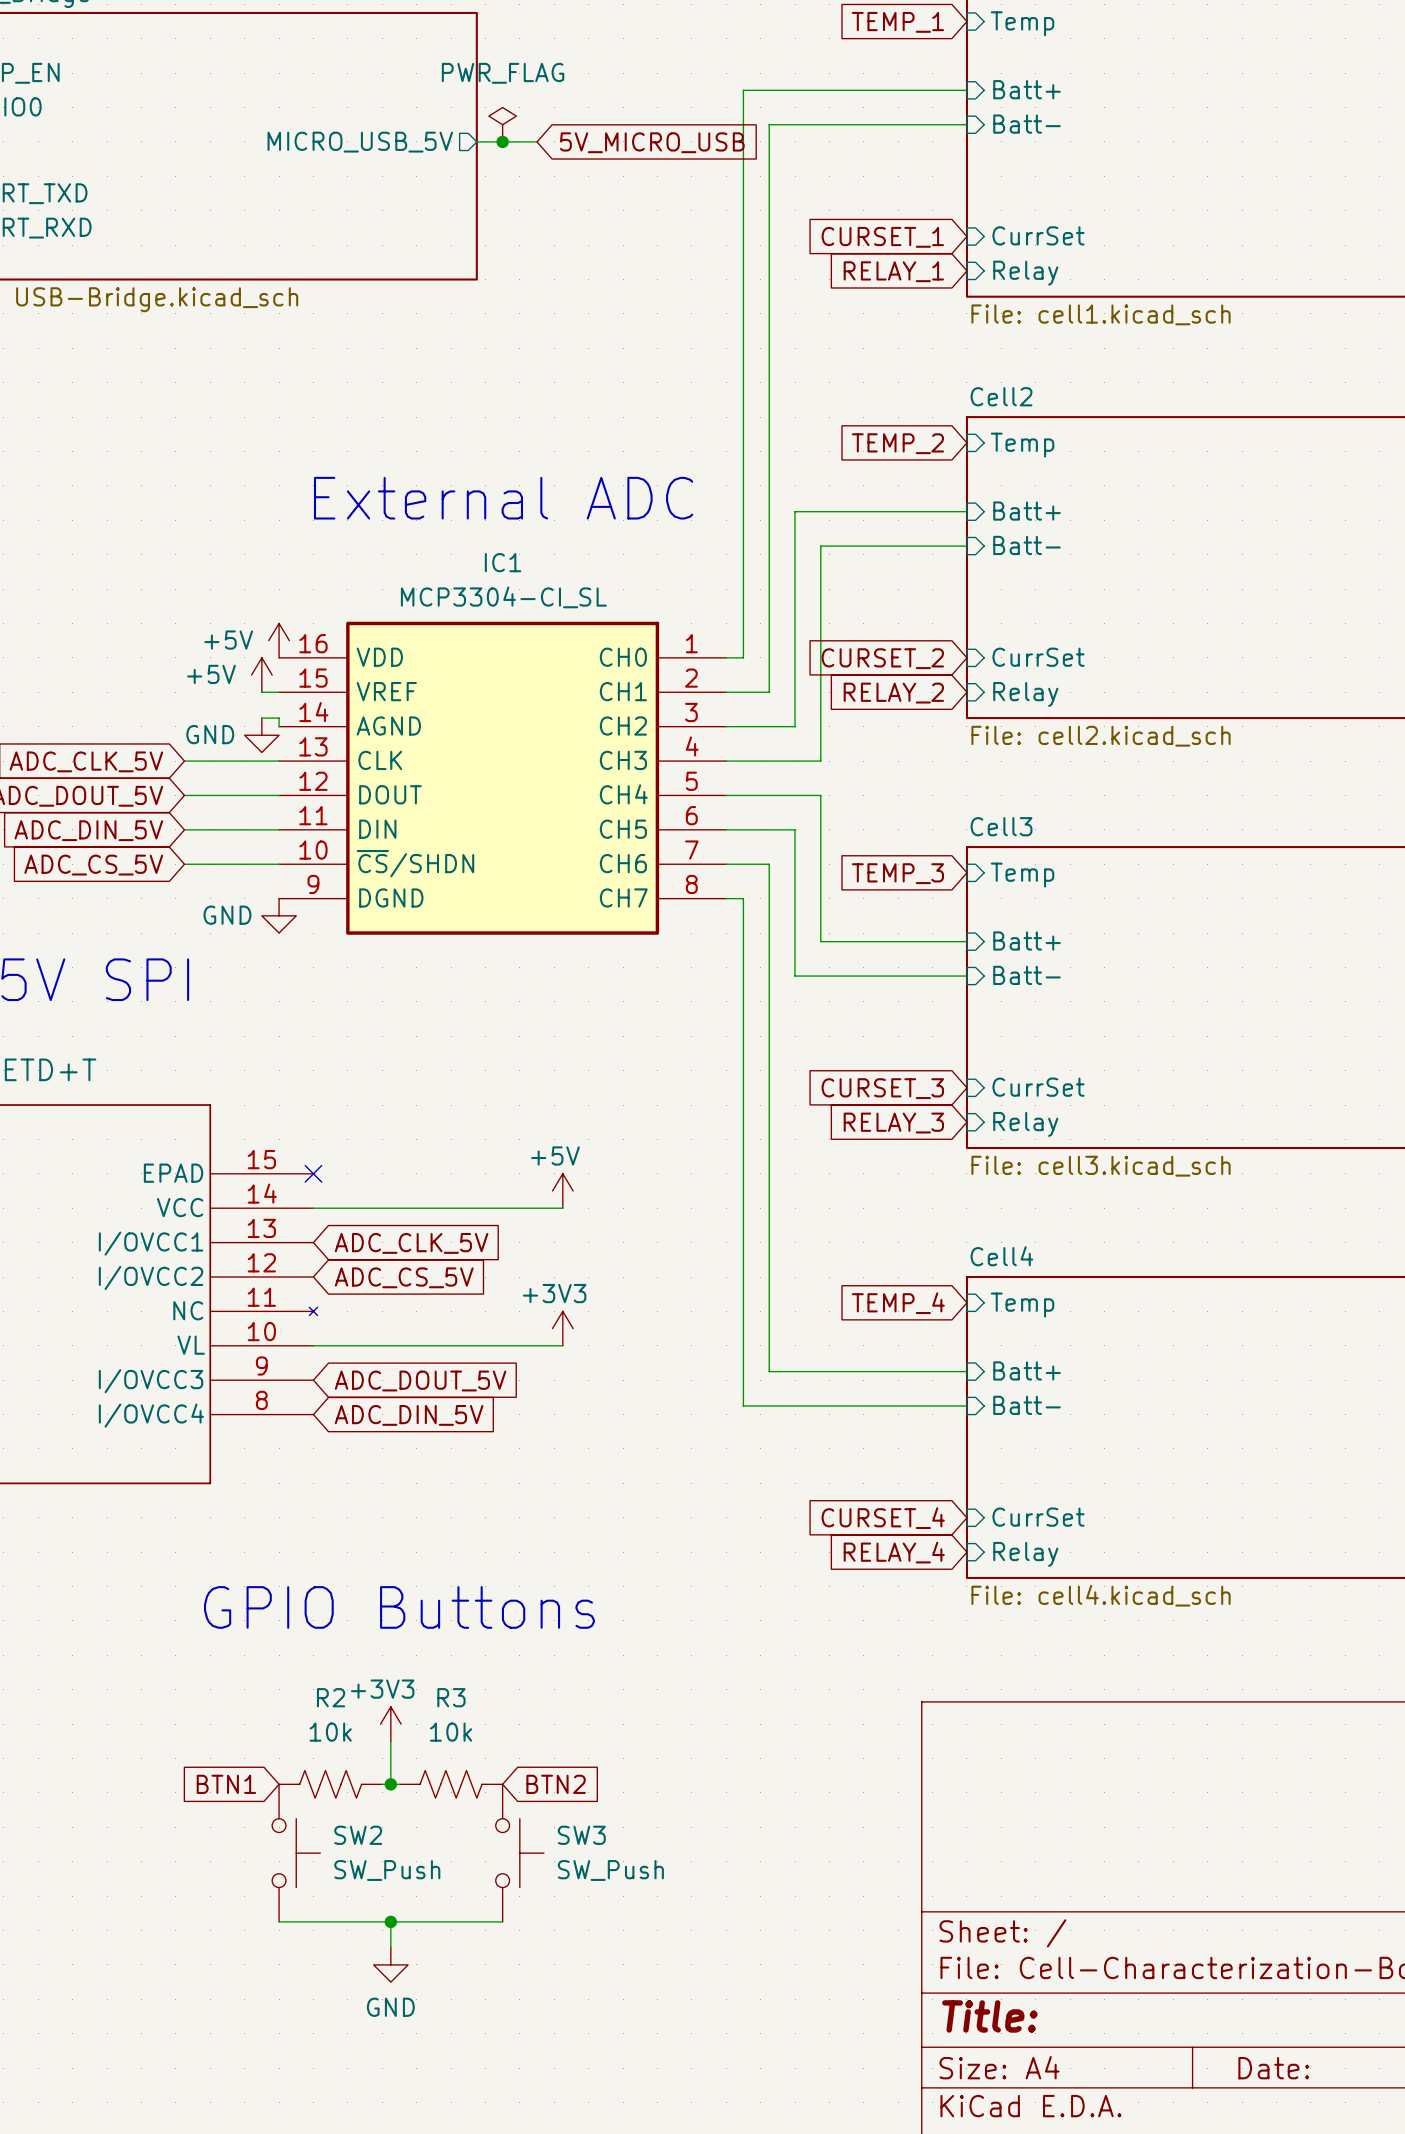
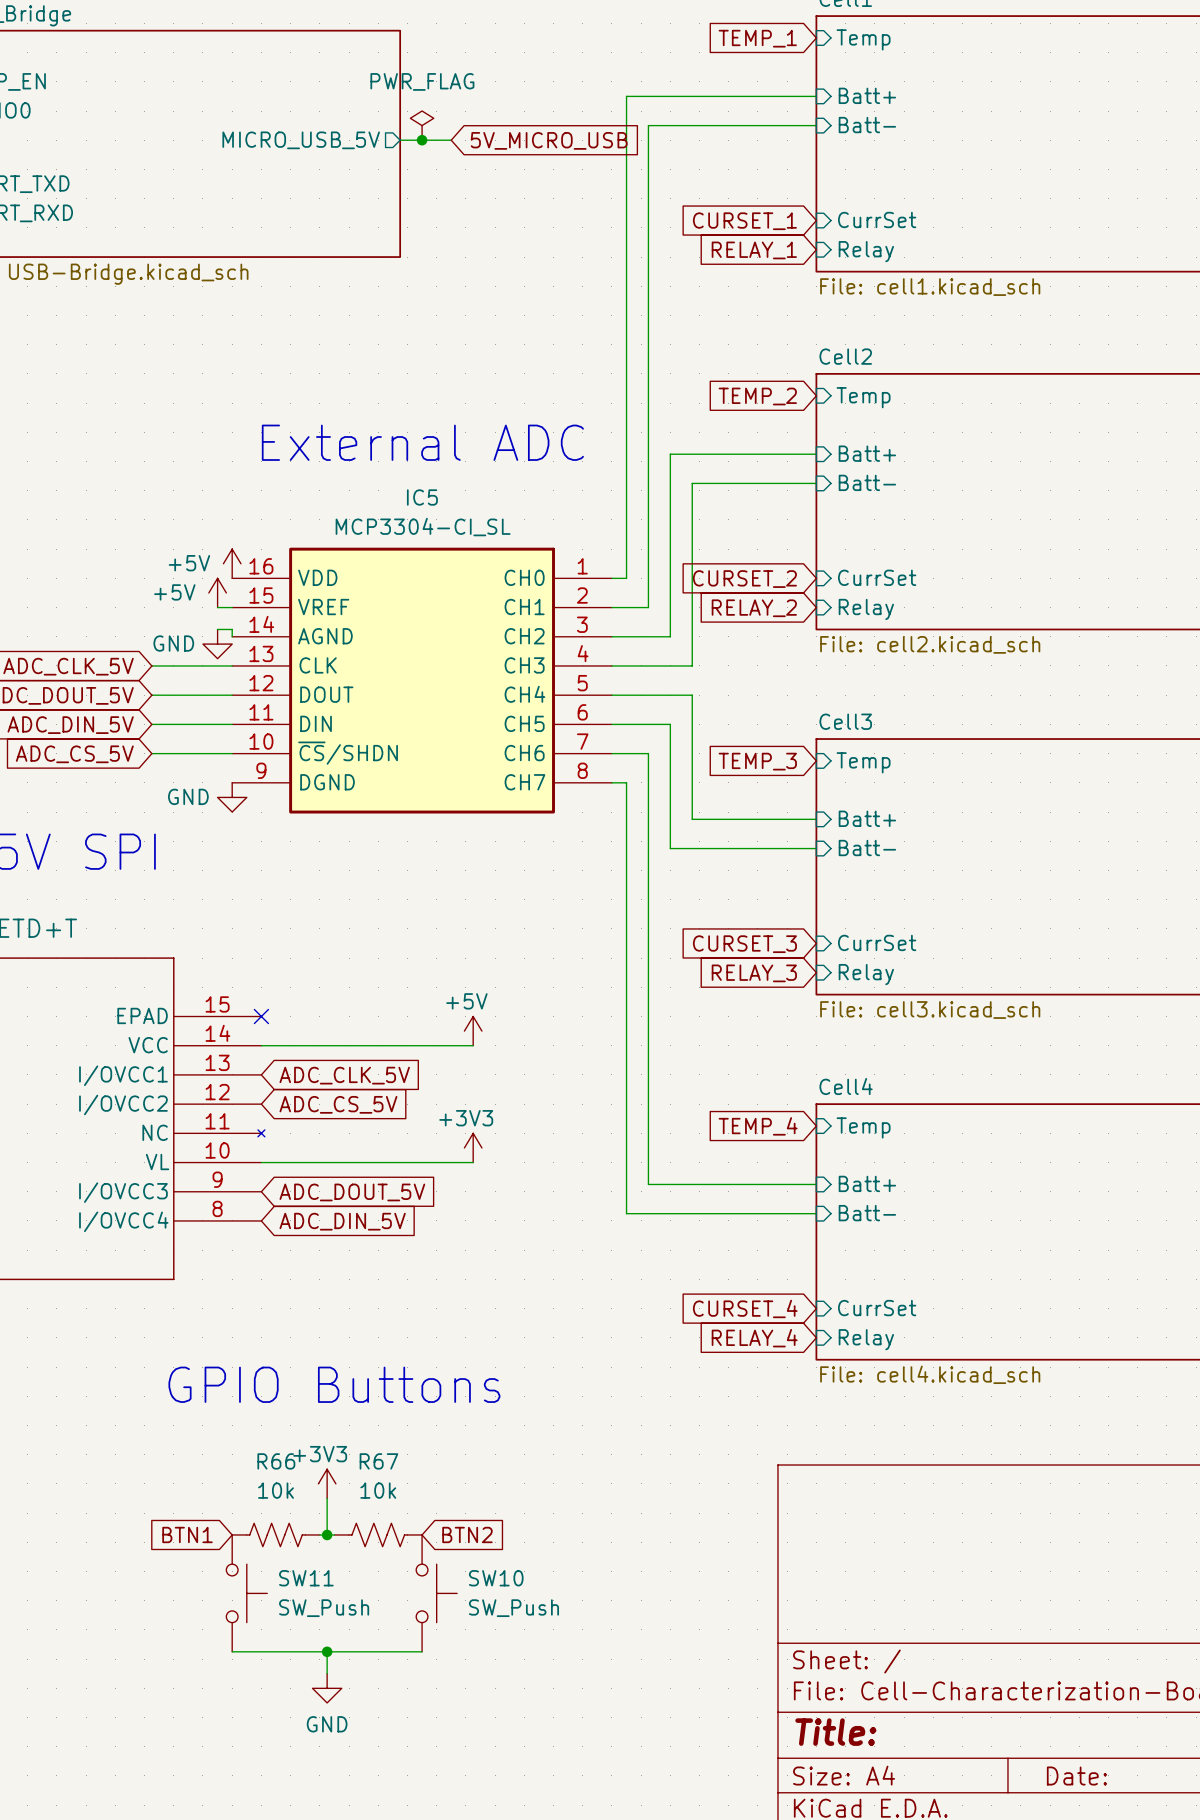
IC1 name: IC1 (503, 562) -> IC5 (422, 497)
R2 name: R2 (331, 1697) -> R66 (276, 1461)
R3 name: R3 (451, 1697) -> R67 (378, 1461)
SW2 name: SW2 (358, 1835) -> SW11 (306, 1578)
SW3 name: SW3 (581, 1835) -> SW10 (496, 1578)

